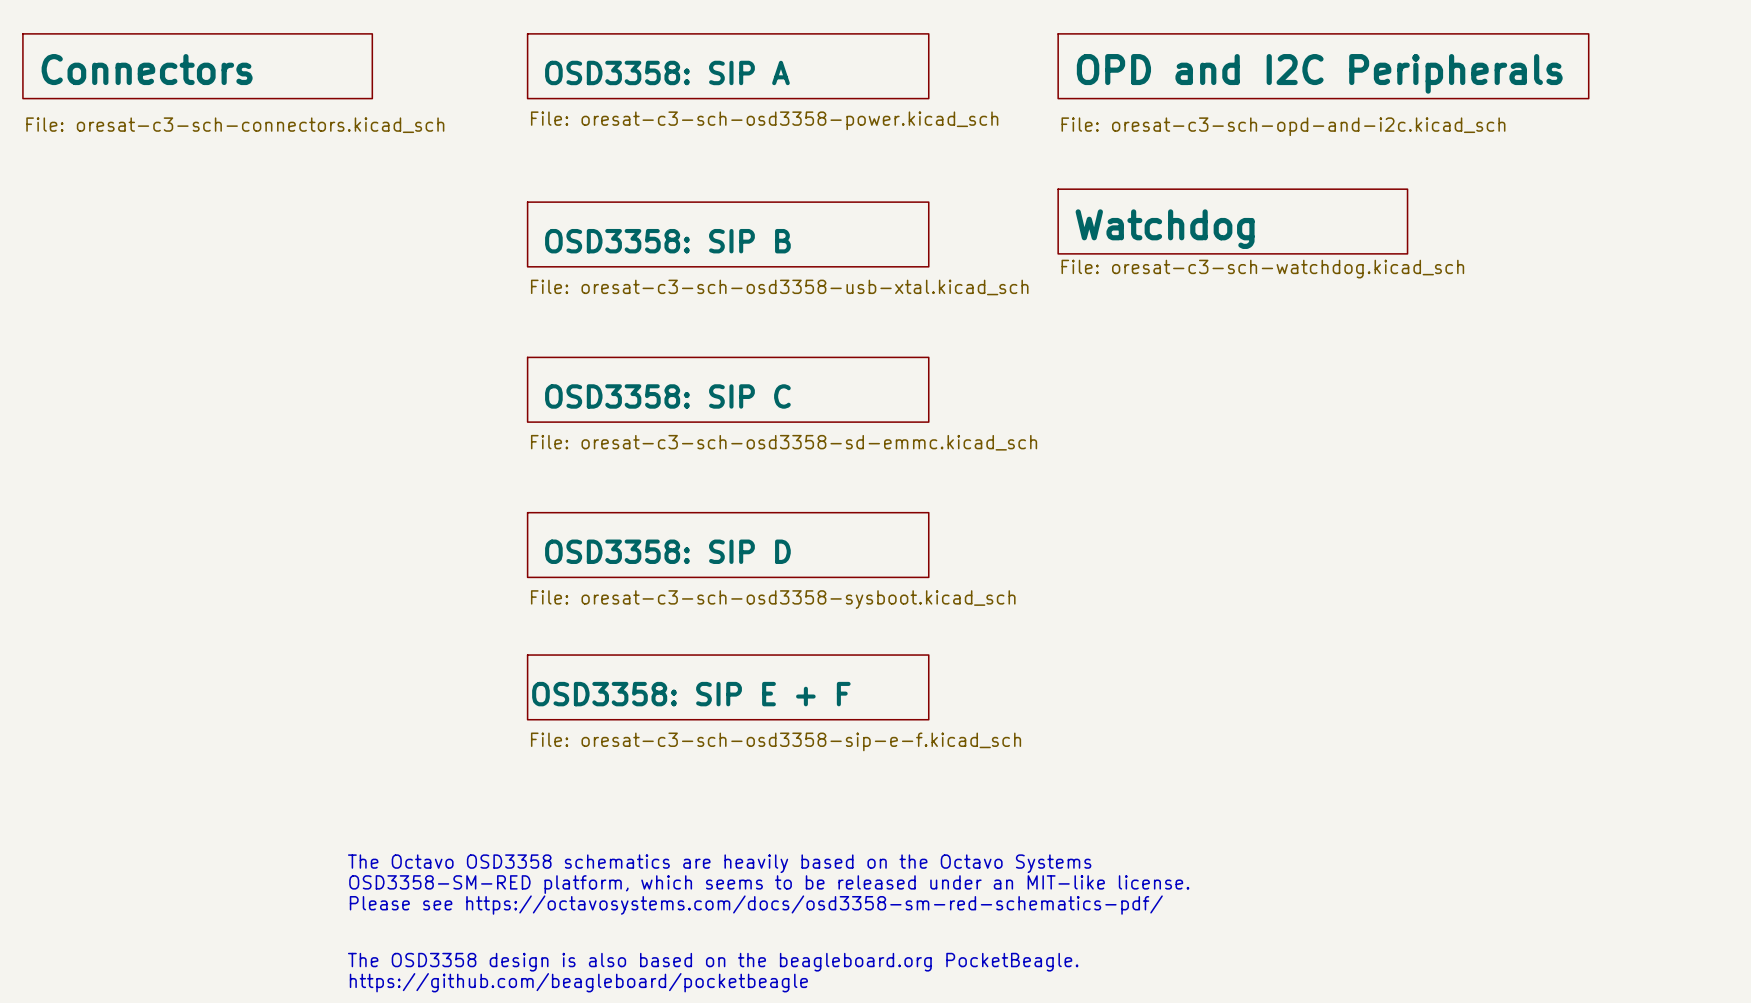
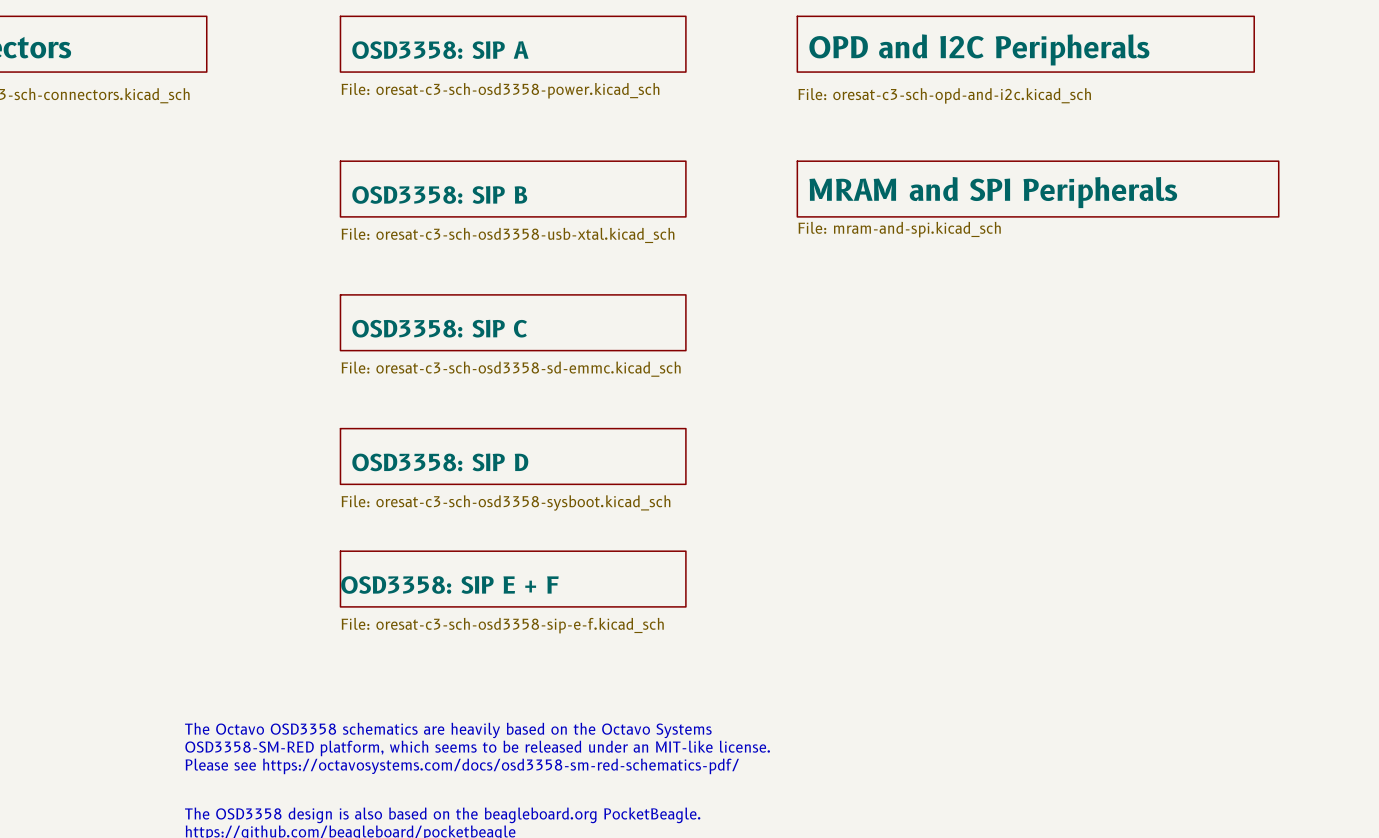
sheet Watchdog: File: oresat-c3-sch-watchdog.kicad_sch (1232, 221) -> none
sheet MRAM and SPI Peripherals: none -> File: mram-and-spi.kicad_sch (1038, 189)

